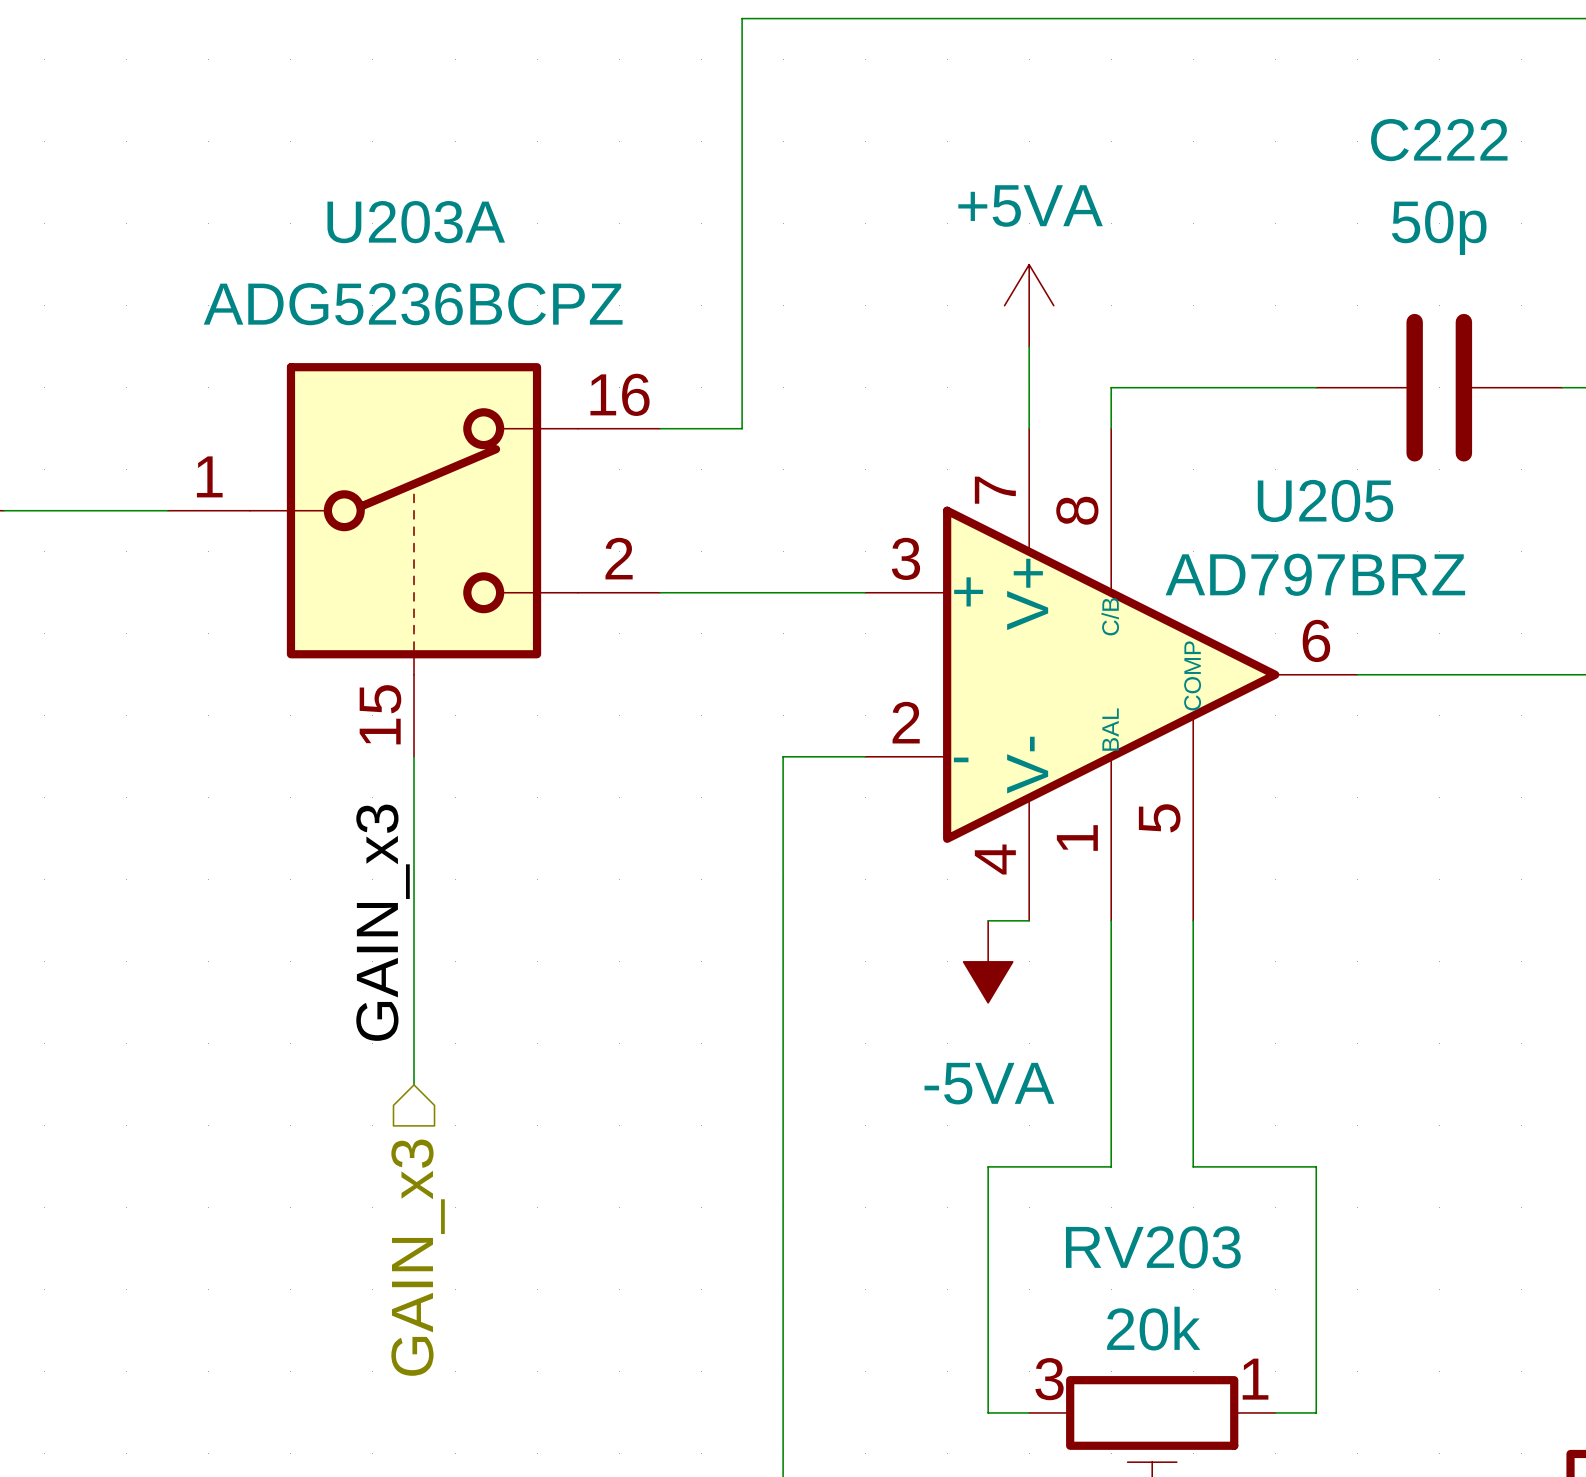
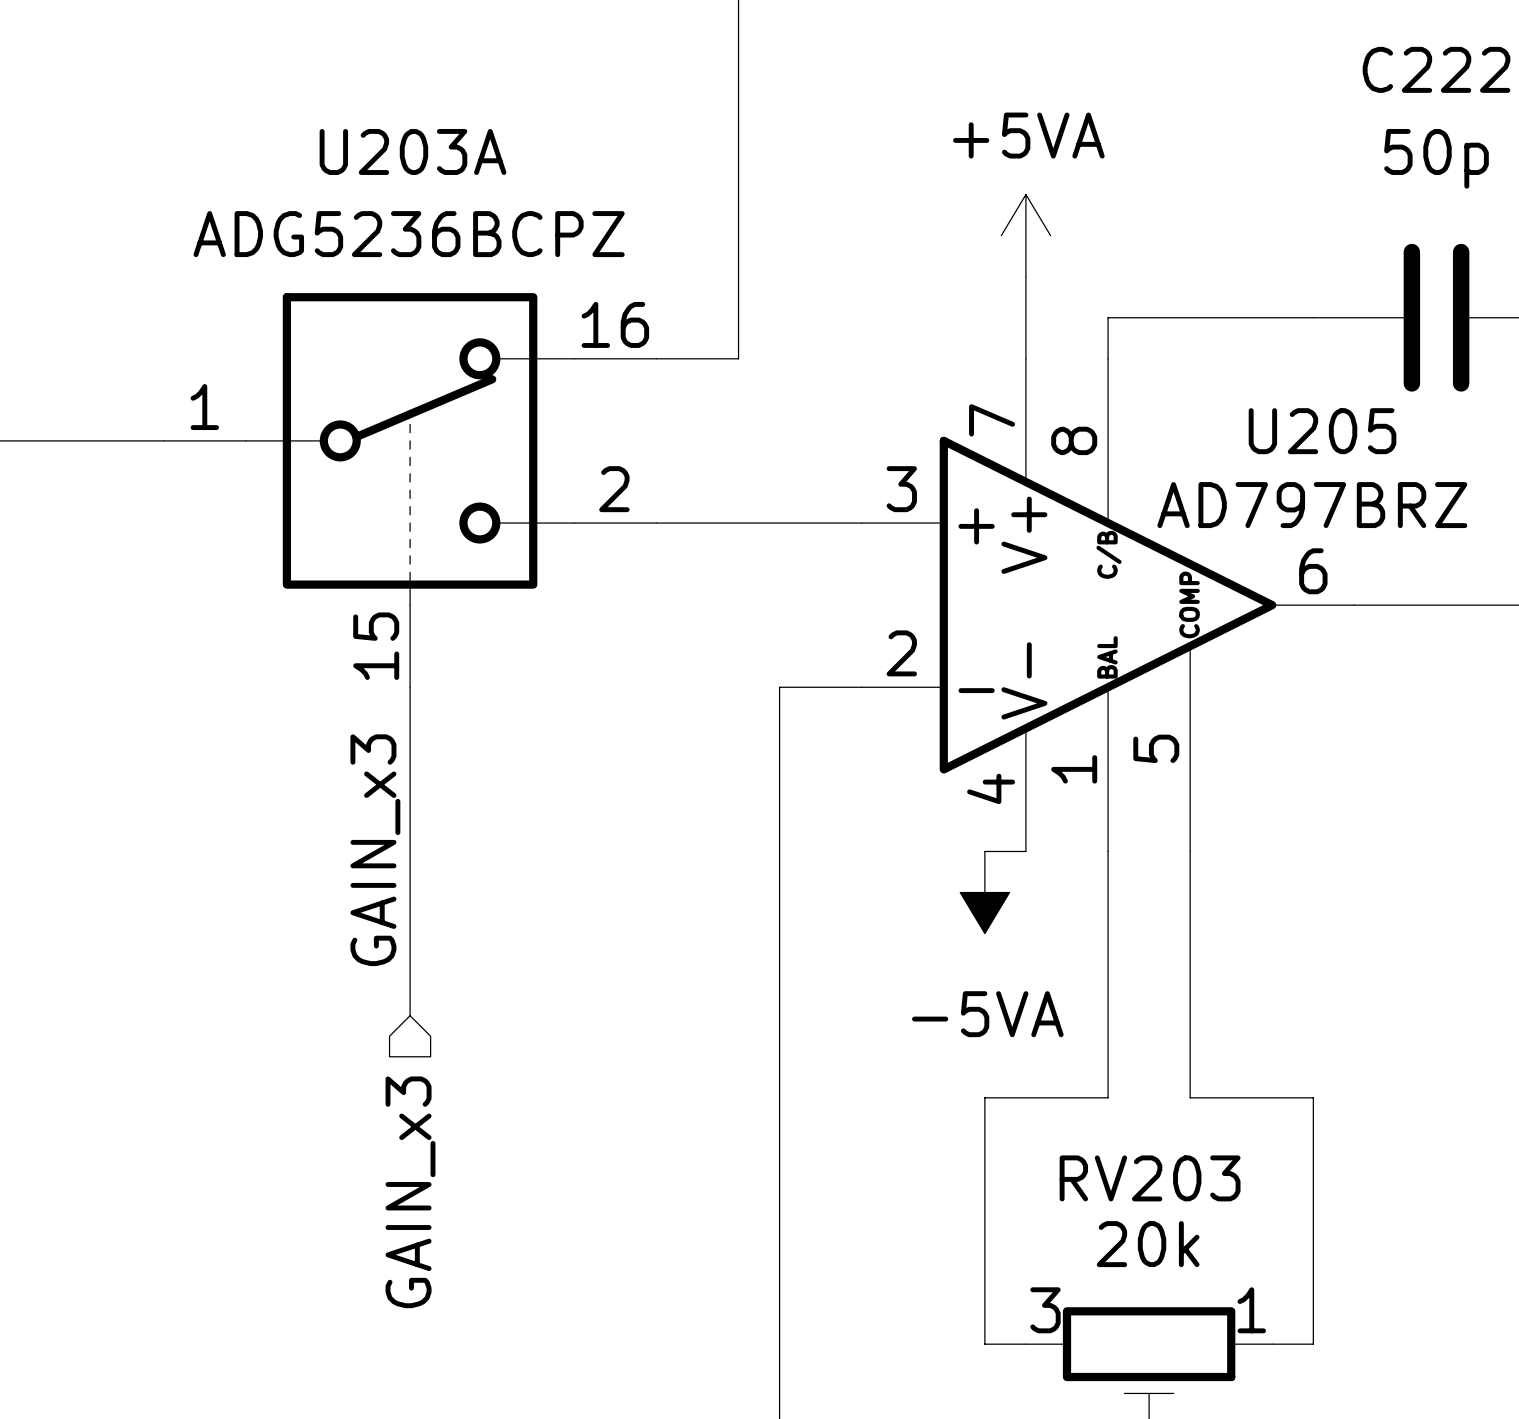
RV203 value position: 20k (1153, 1328) -> 20k (1148, 1244)

